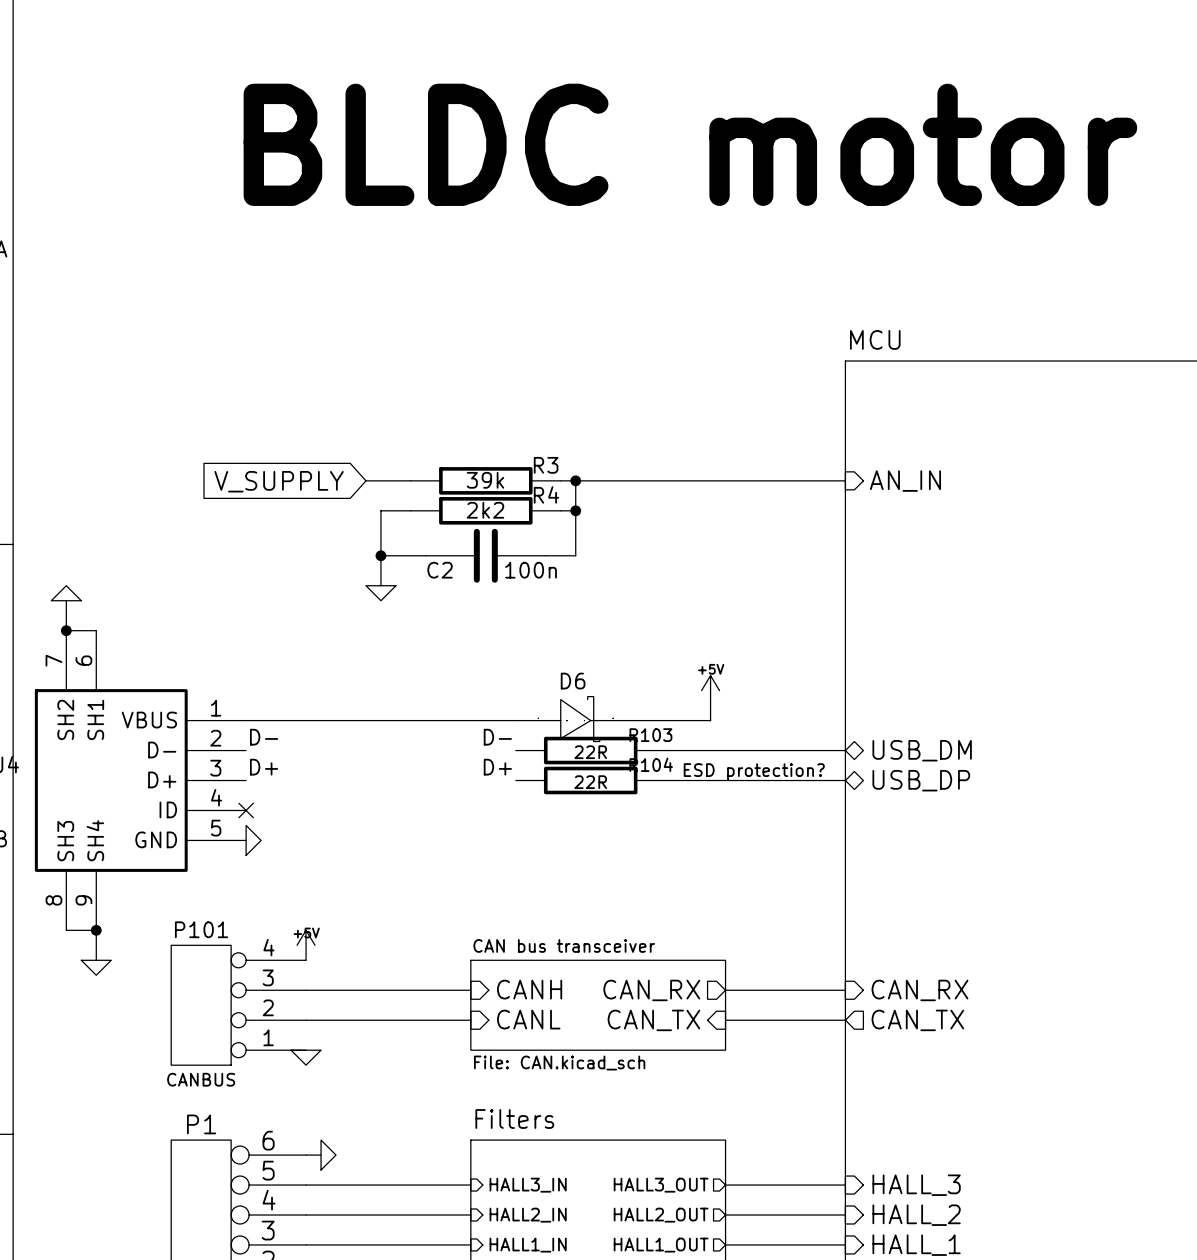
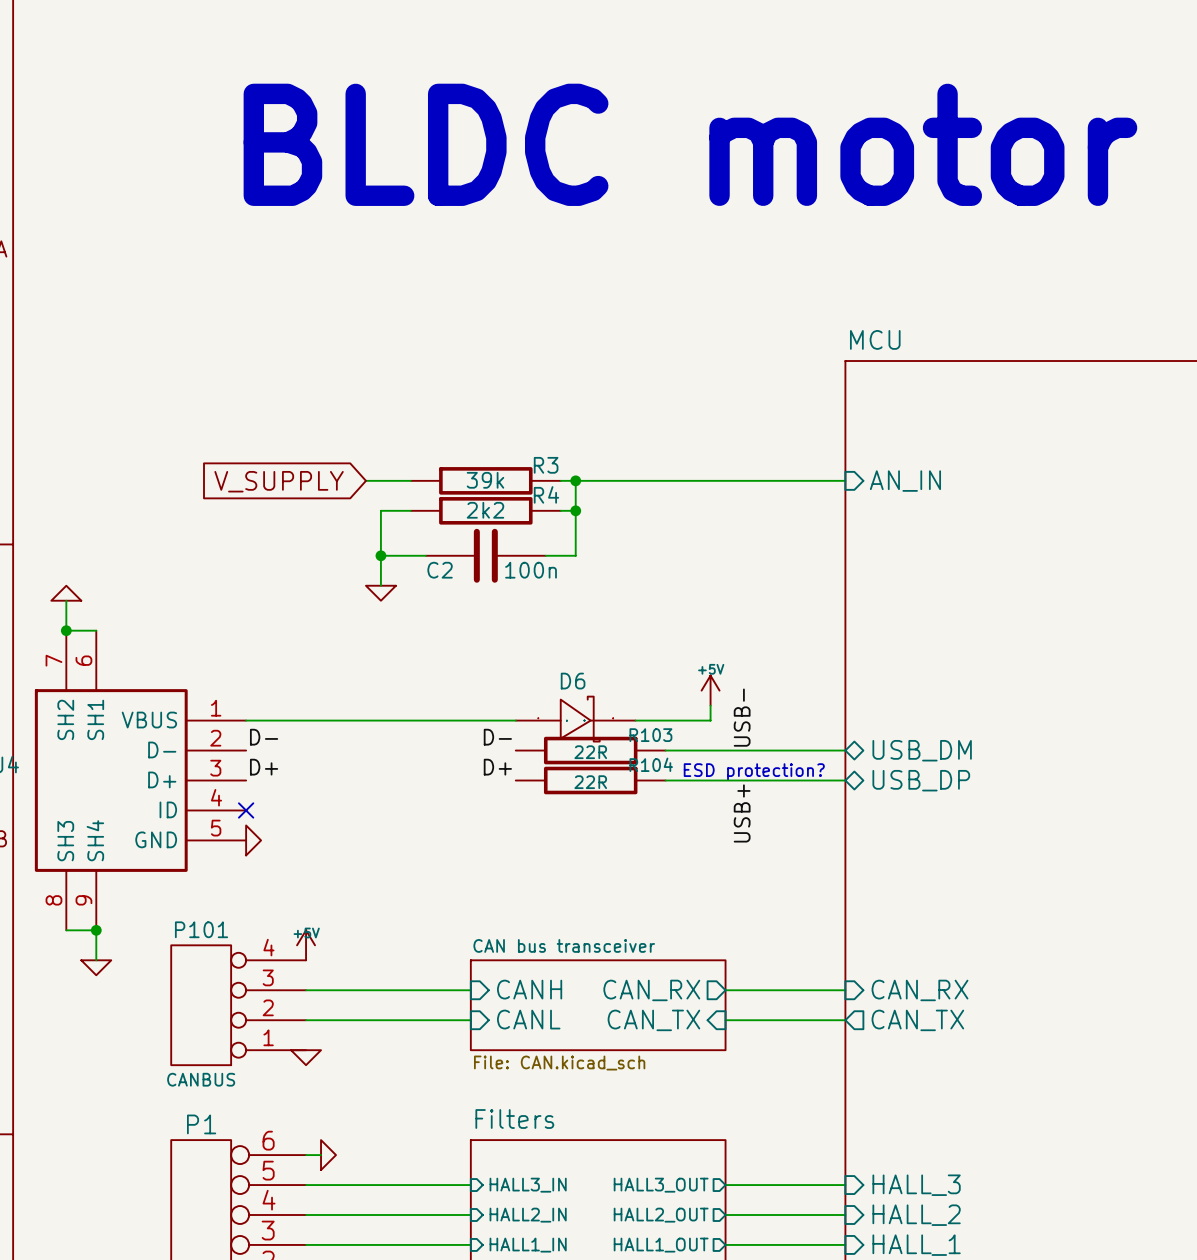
label: none -> USB- (742, 717)
label: none -> USB+ (742, 813)

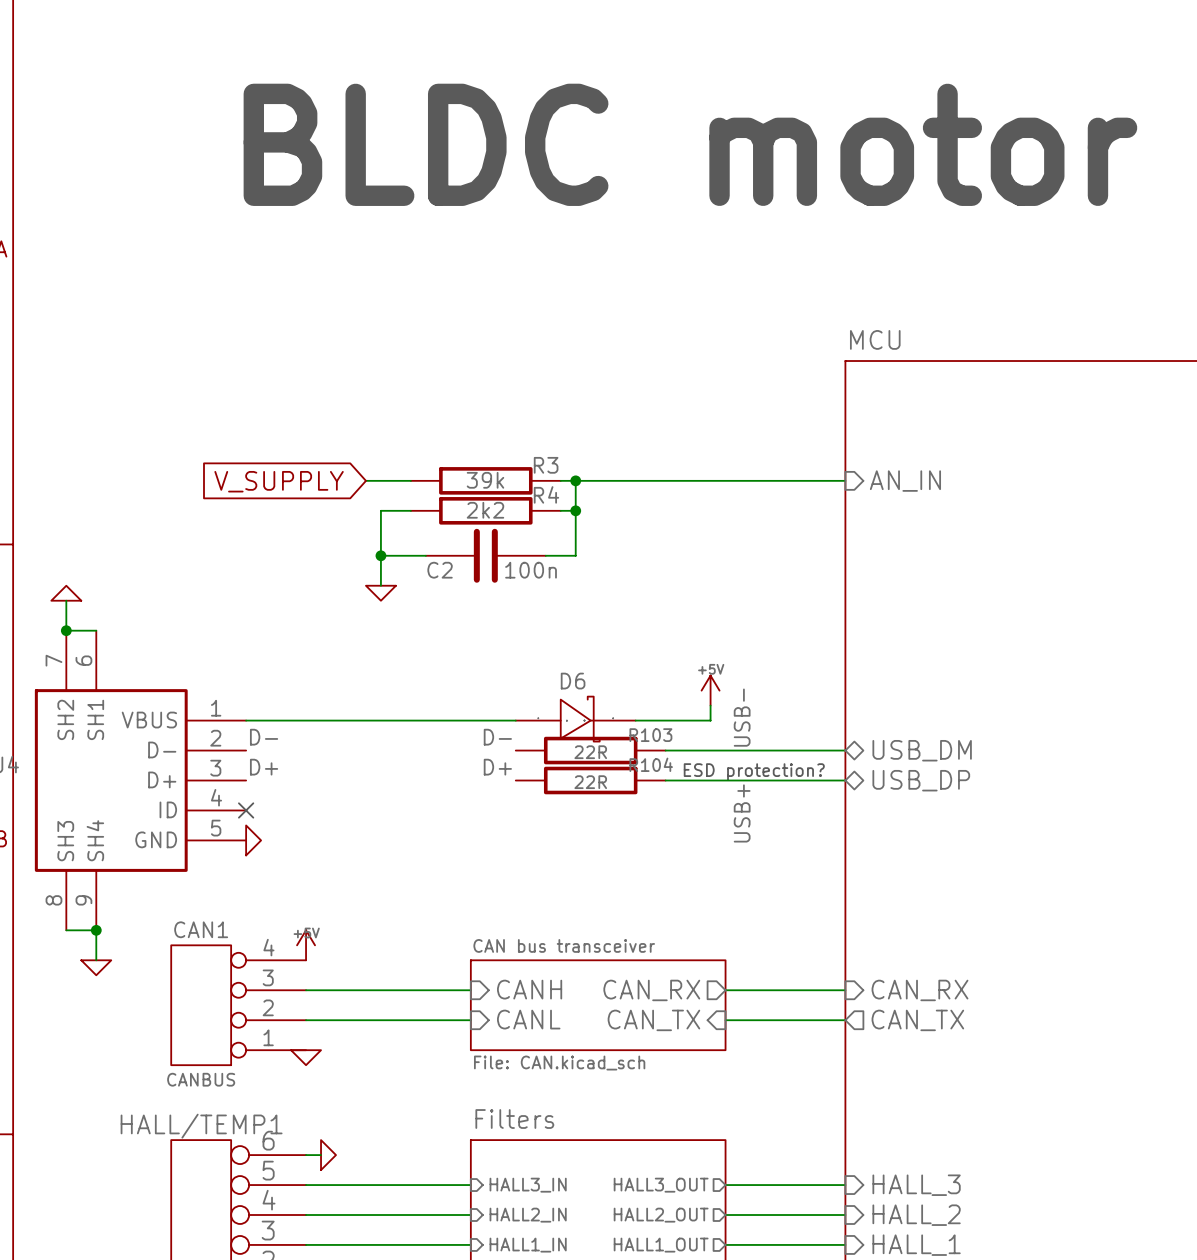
P101 name: P101 (201, 929) -> CAN1 (201, 929)
P1 name: P1 (201, 1124) -> HALL/TEMP1 (201, 1126)

